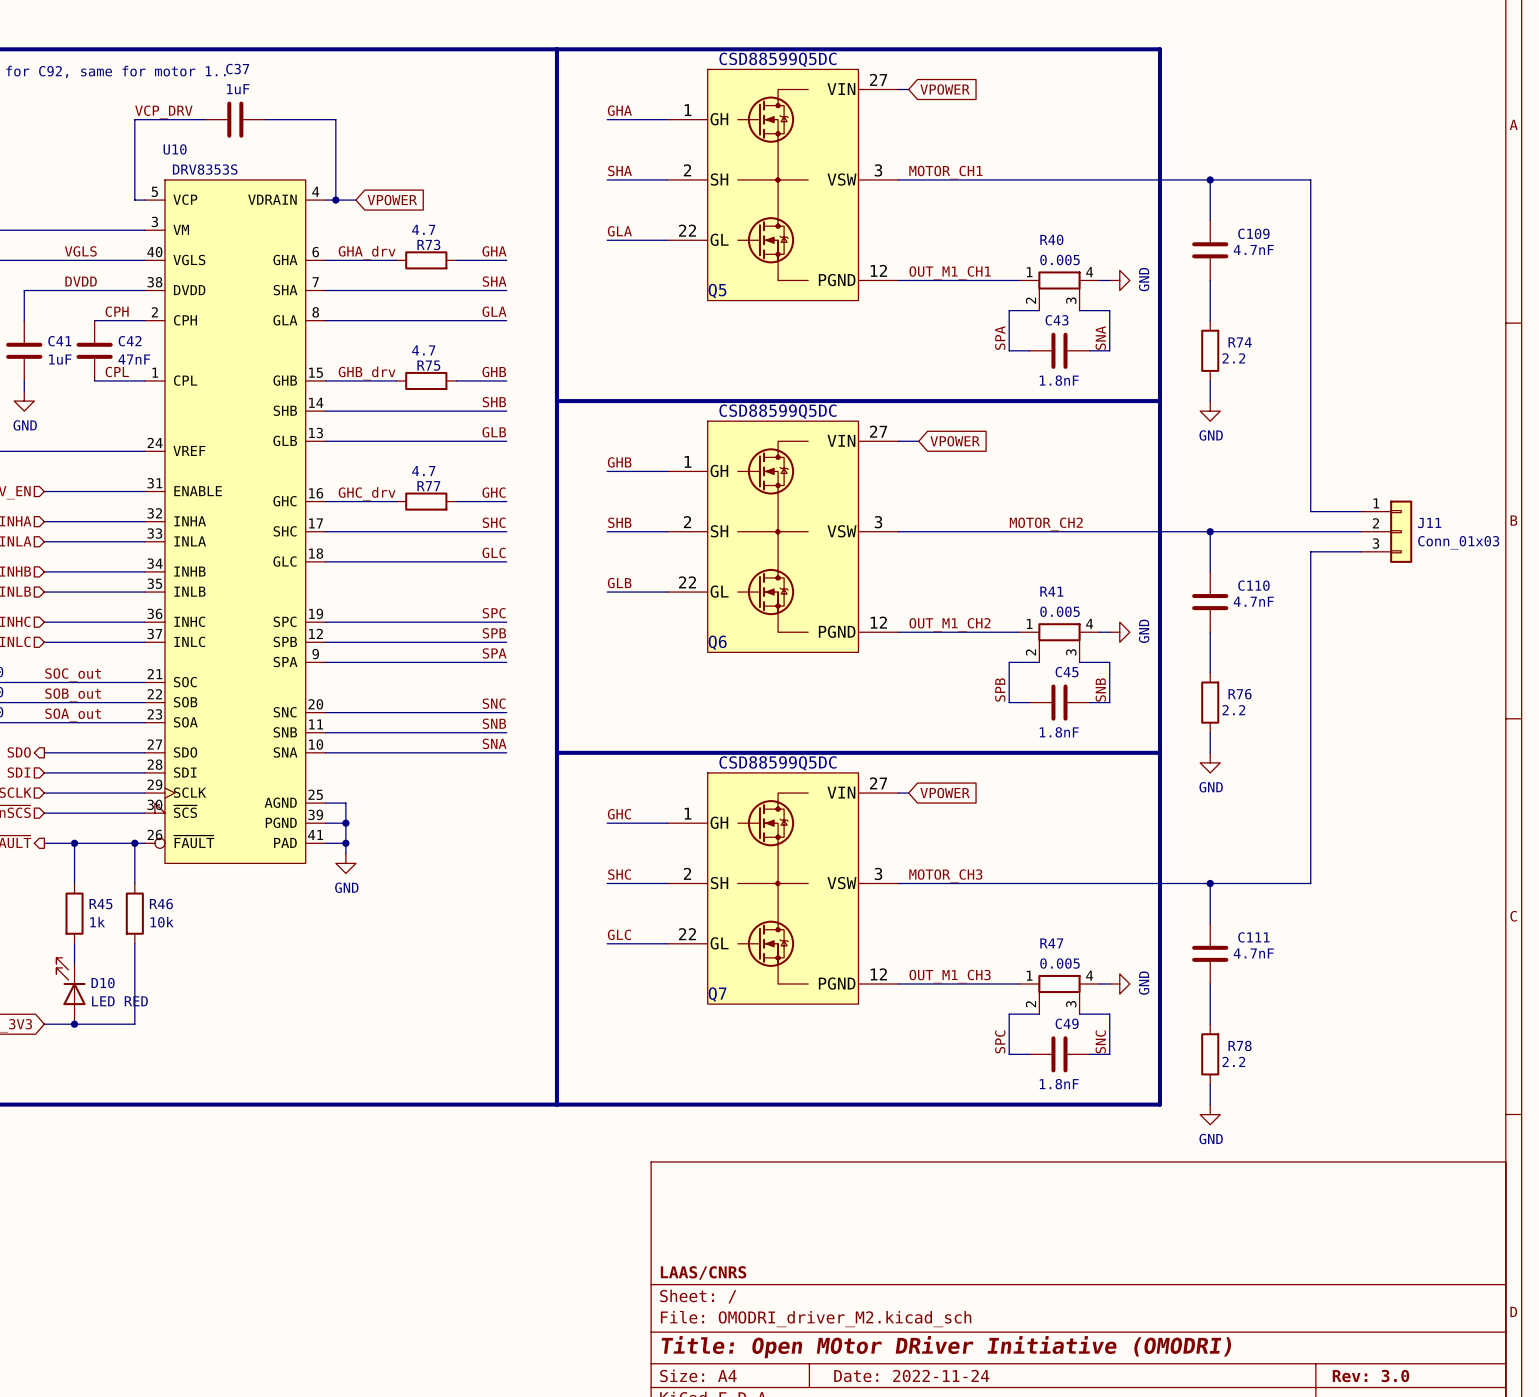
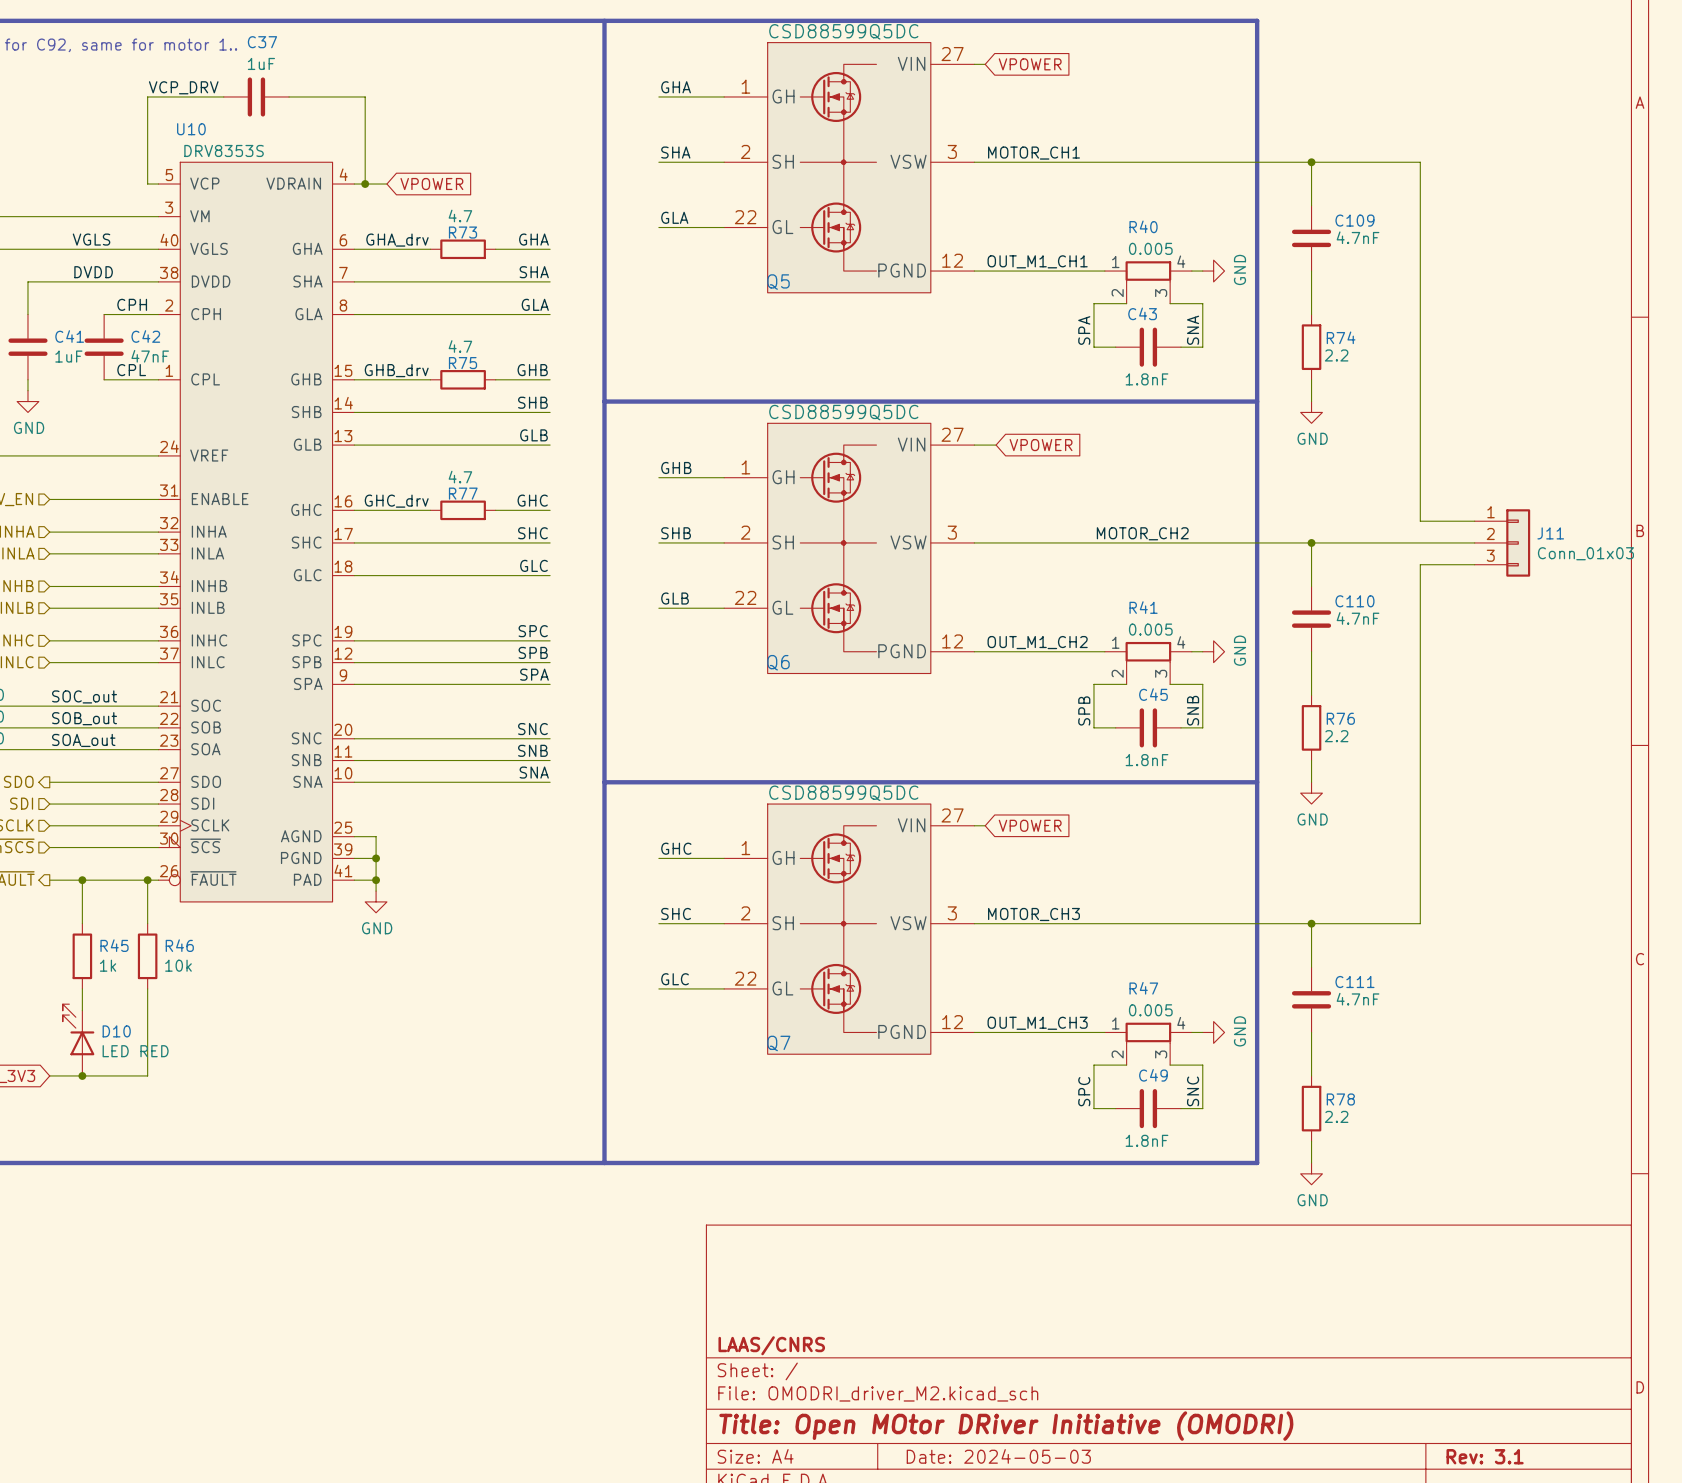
title block: Date: 2022-11-24 (911, 1376) -> Date: 2024-05-03 (998, 1456)
title block: Rev: 3.0 (1370, 1376) -> Rev: 3.1 (1485, 1456)

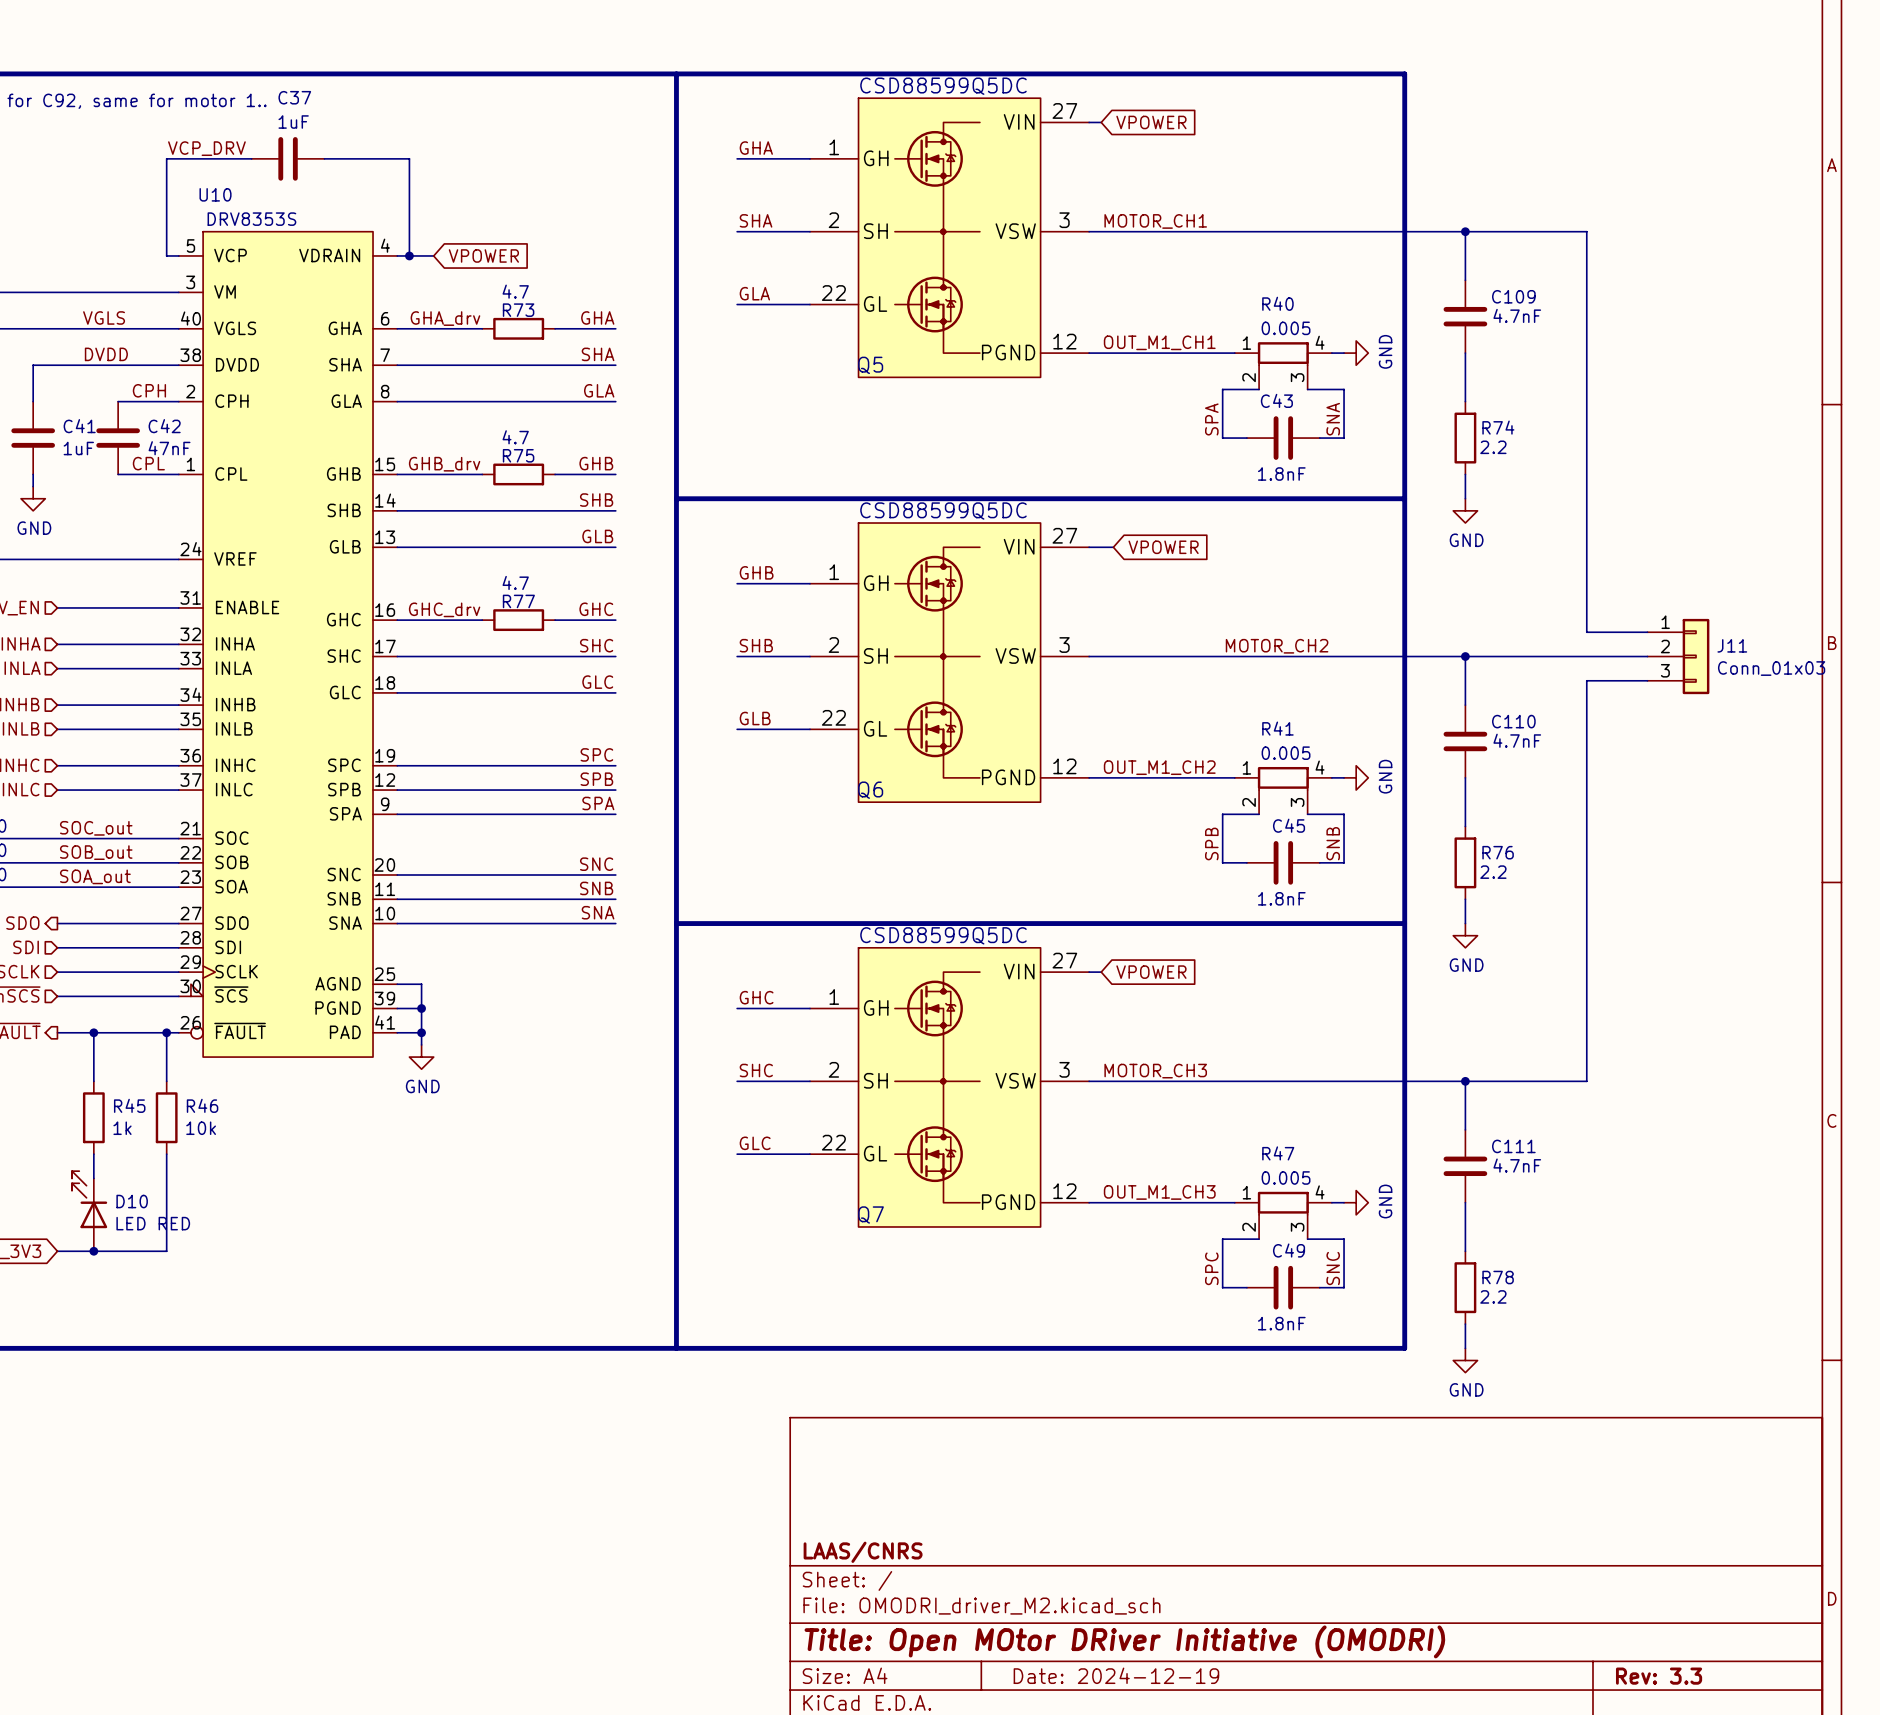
title block: Date: 2024-05-03 (998, 1456) -> Date: 2024-12-19 (1116, 1675)
title block: Rev: 3.1 (1485, 1456) -> Rev: 3.3 (1659, 1676)

